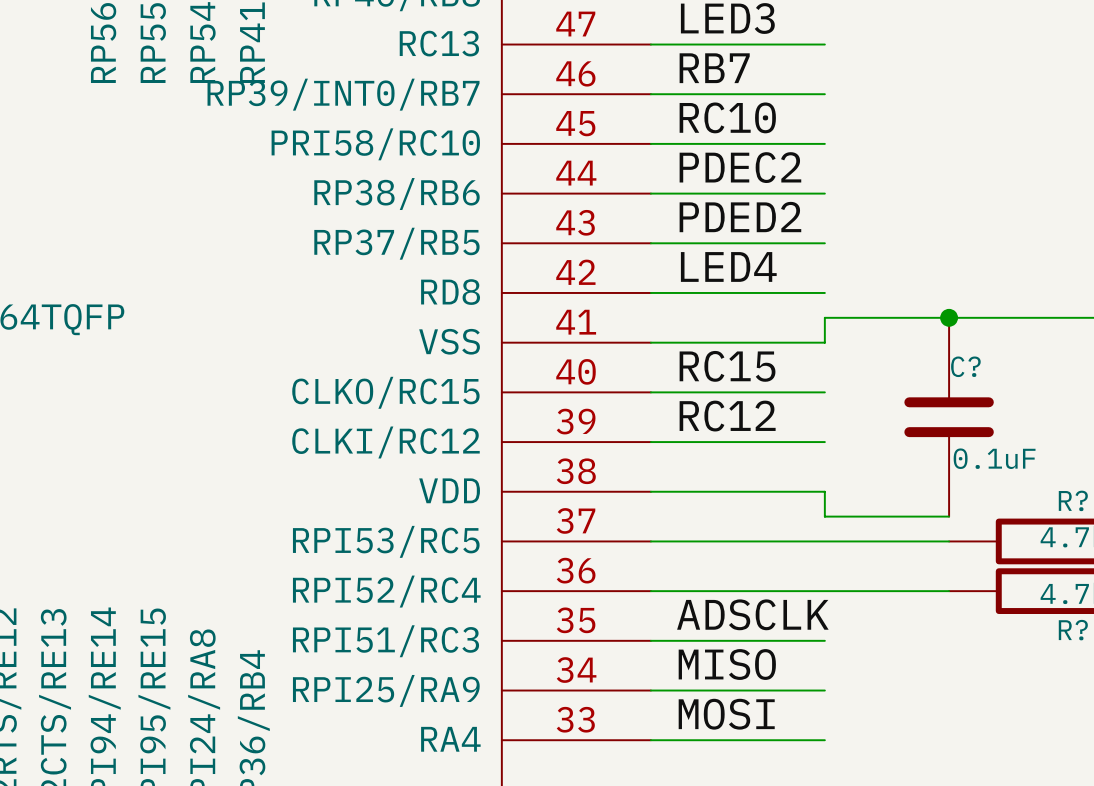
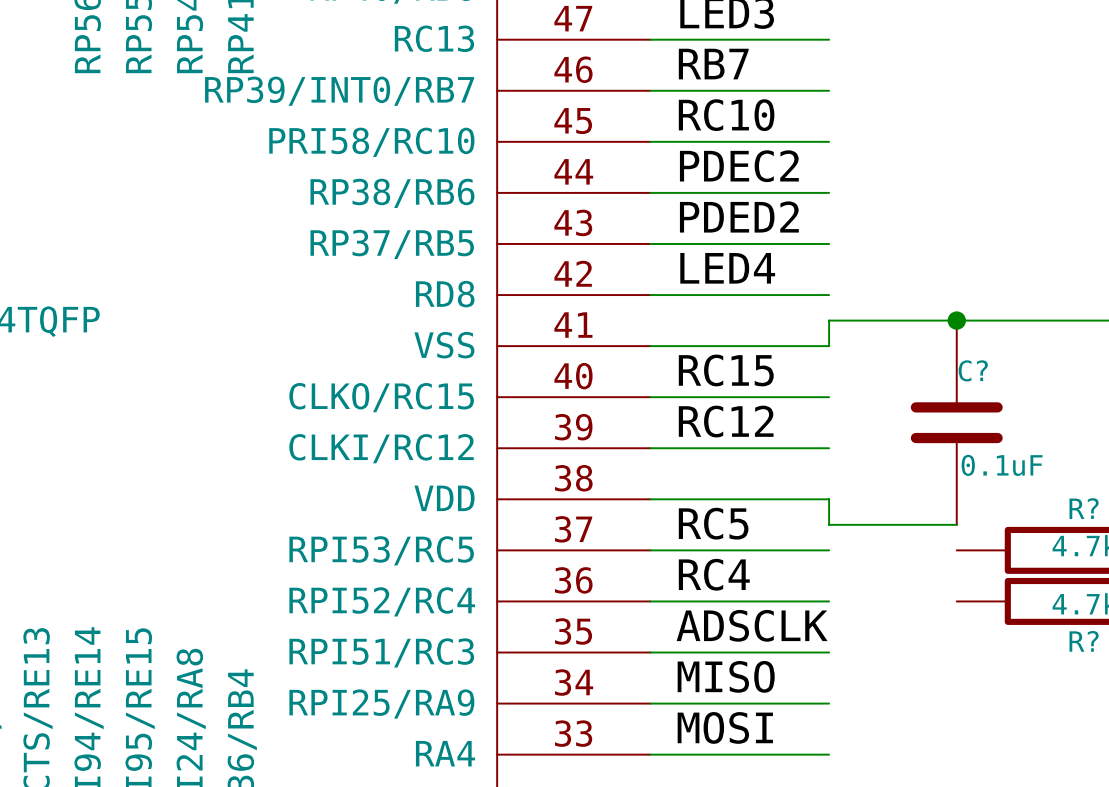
label: none -> RC5 (713, 523)
wire: (824, 541) (949, 541) -> none
label: none -> RC4 (714, 574)
wire: (824, 591) (949, 591) -> none

